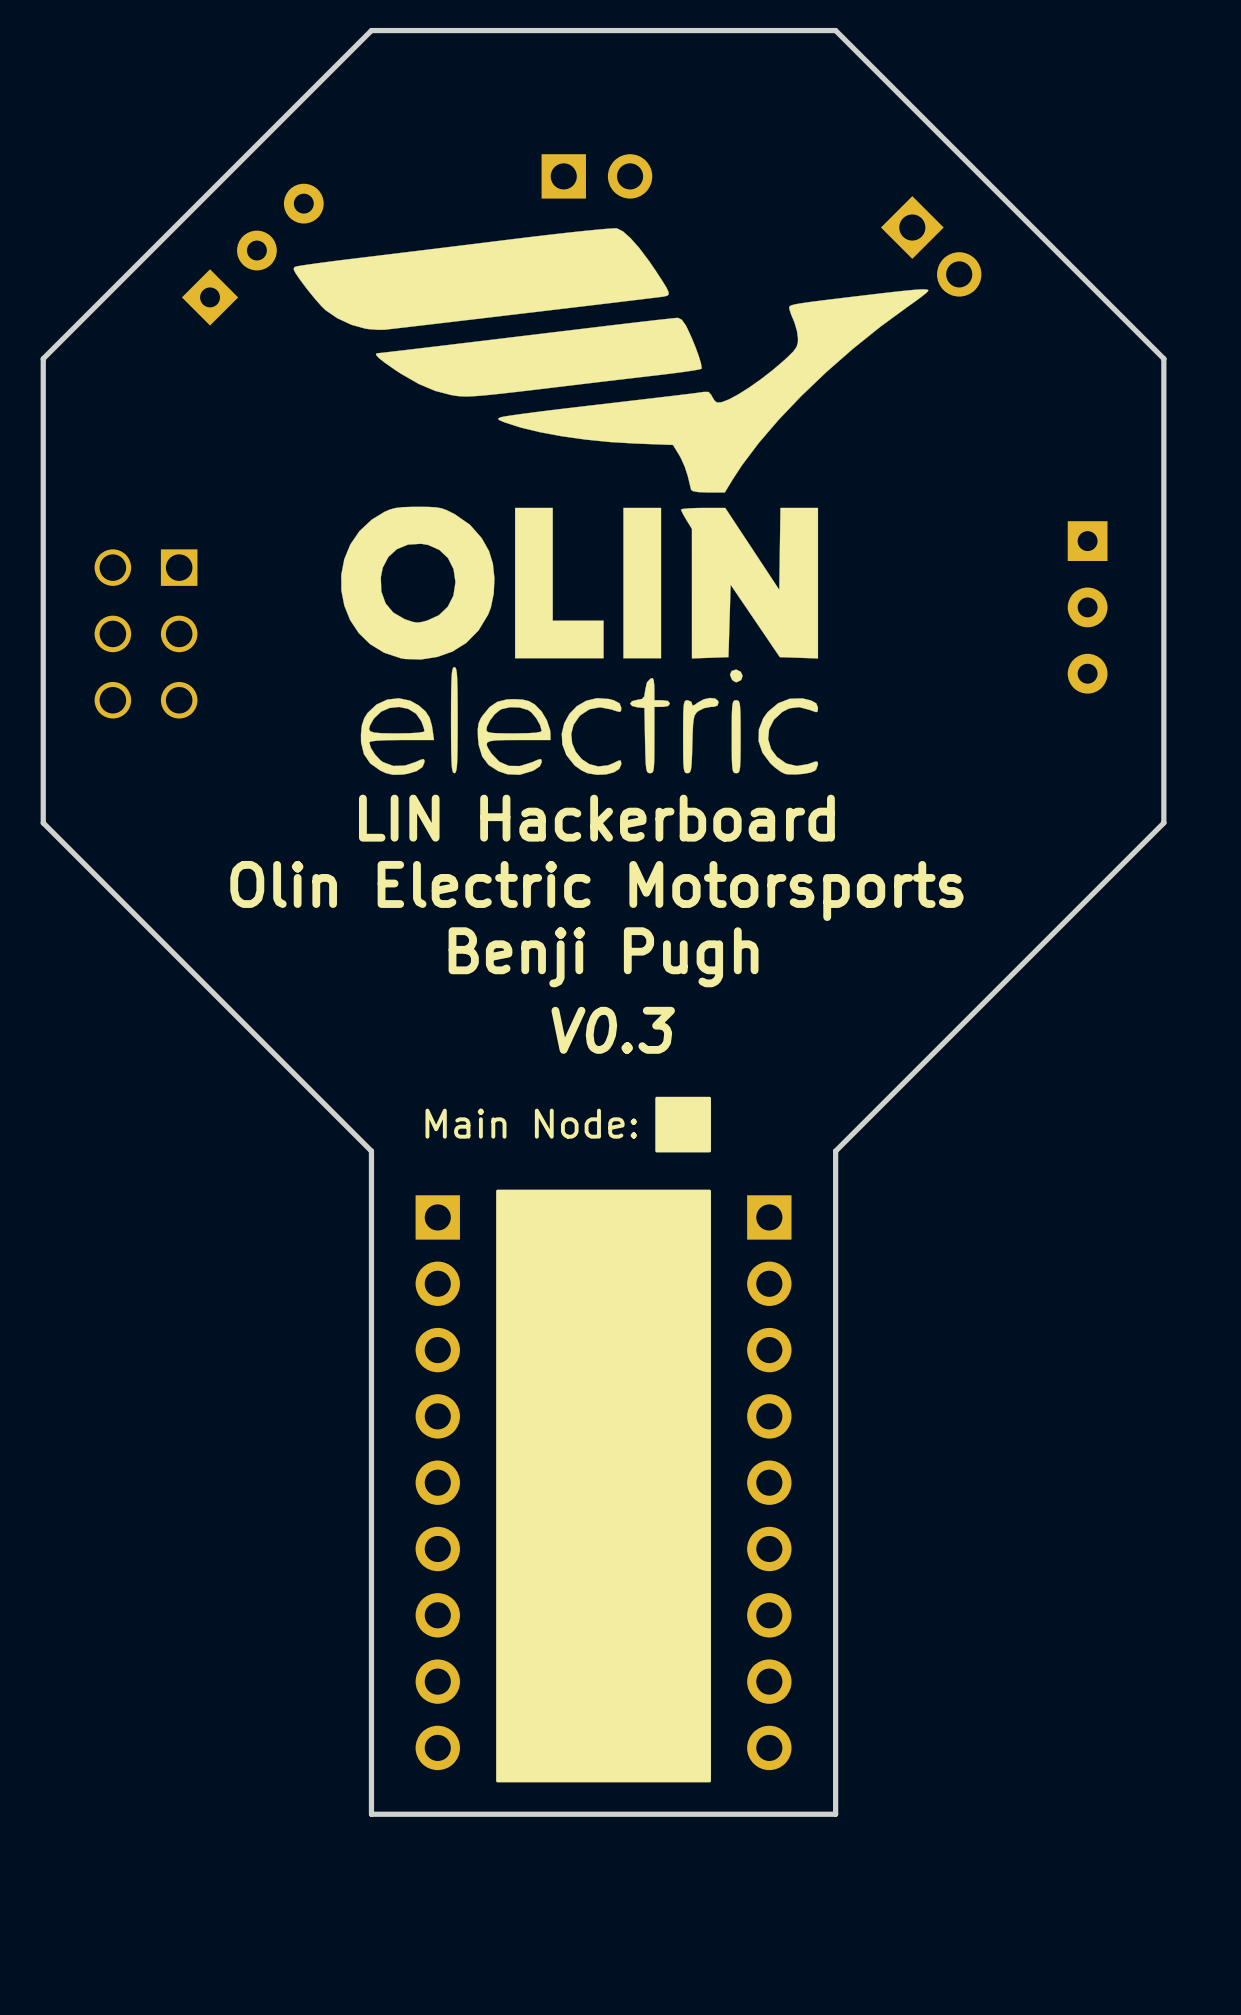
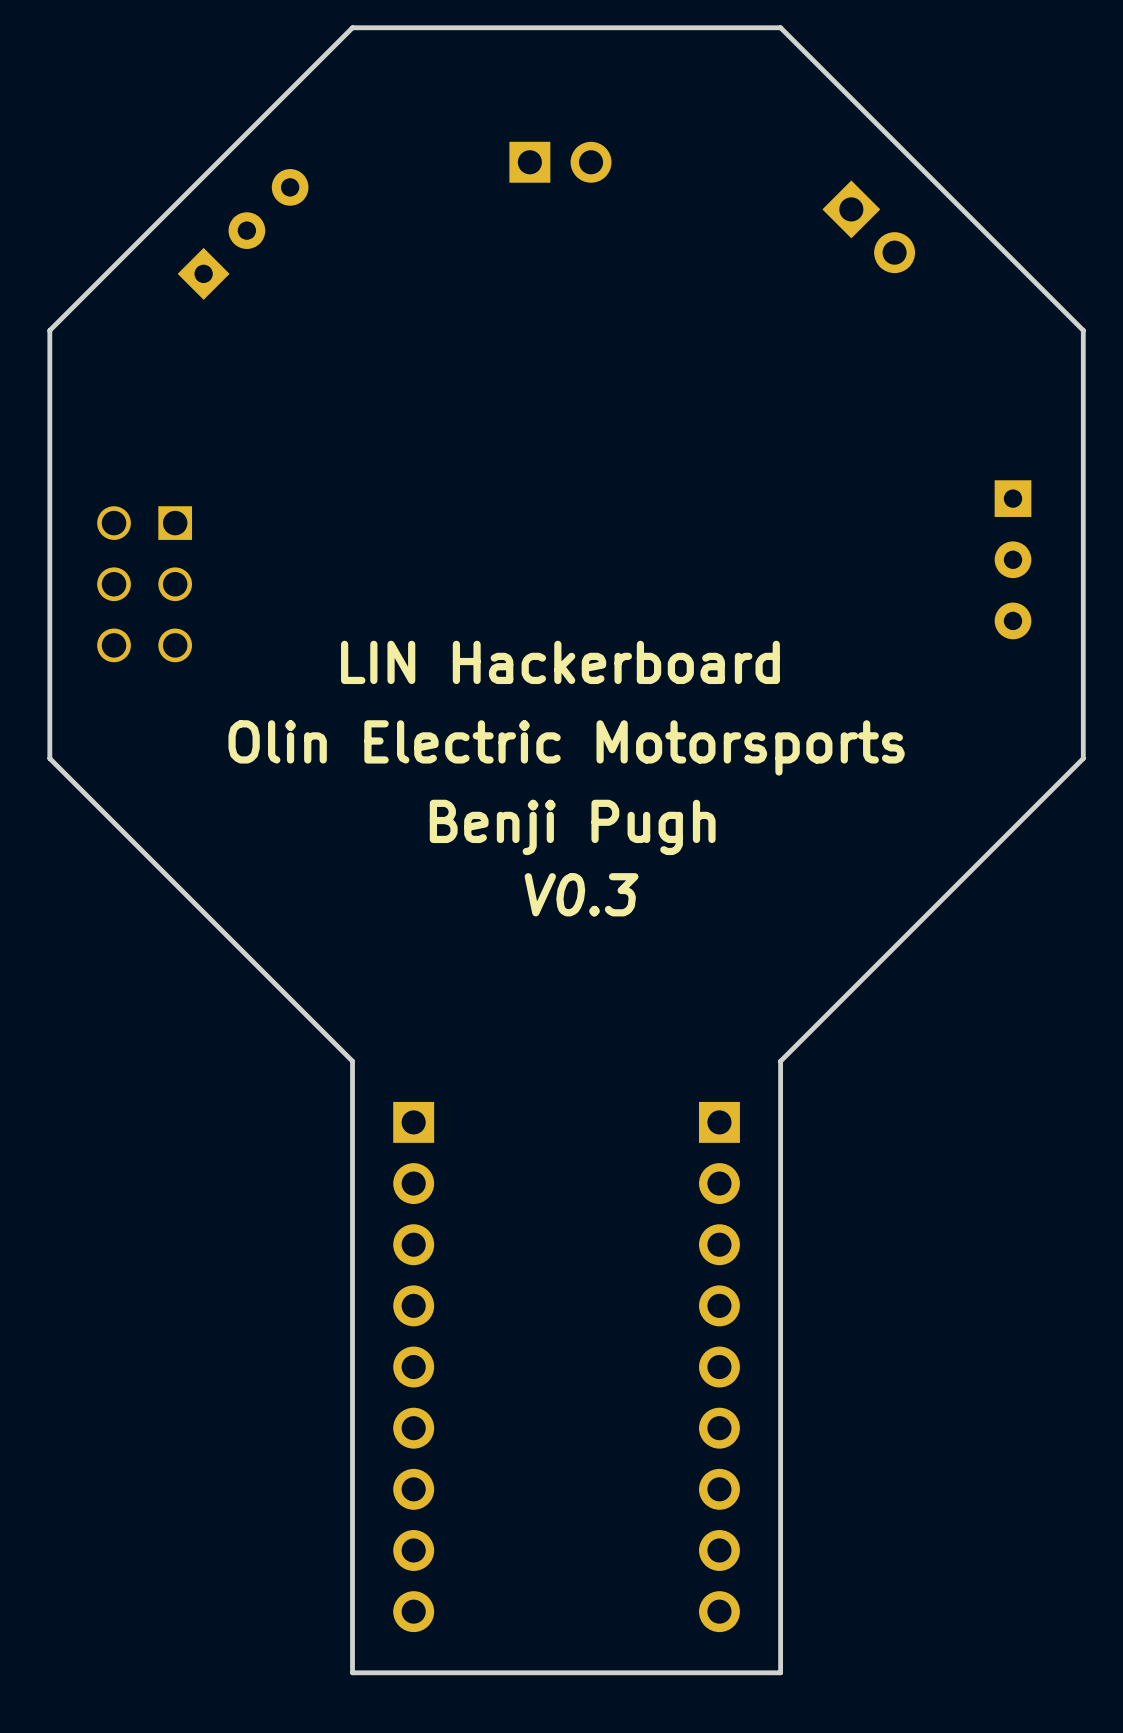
drawing: [293, 228, 929, 775] -> none
text: none -> LIN Hackerboard (560, 662)
text: LIN Hackerboard (596, 818) -> Olin Electric Motorsports (566, 747)
text: Olin Electric Motorsports (596, 890) -> Benji Pugh (572, 827)
text: Benji Pugh (603, 957) -> V0.3 (581, 894)
text: V0.3 (613, 1030) -> none
drawing: [655, 1096, 711, 1153] -> none
text: Main Node: (531, 1123) -> none
drawing: [496, 1189, 711, 1783] -> none

